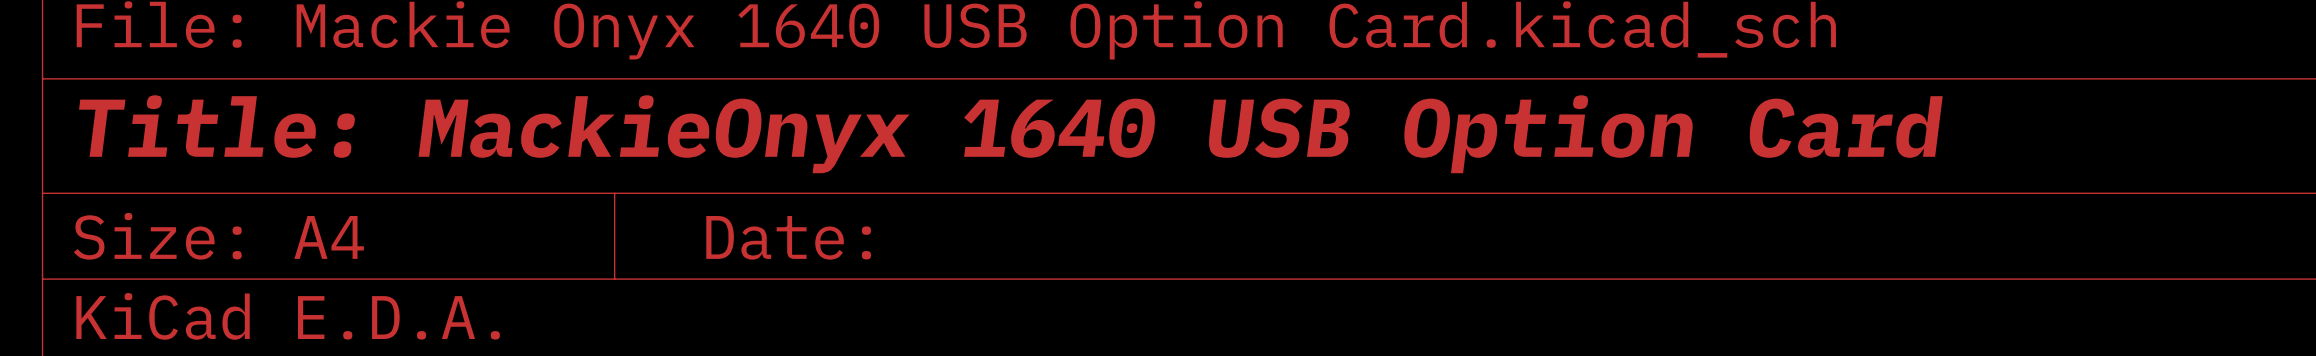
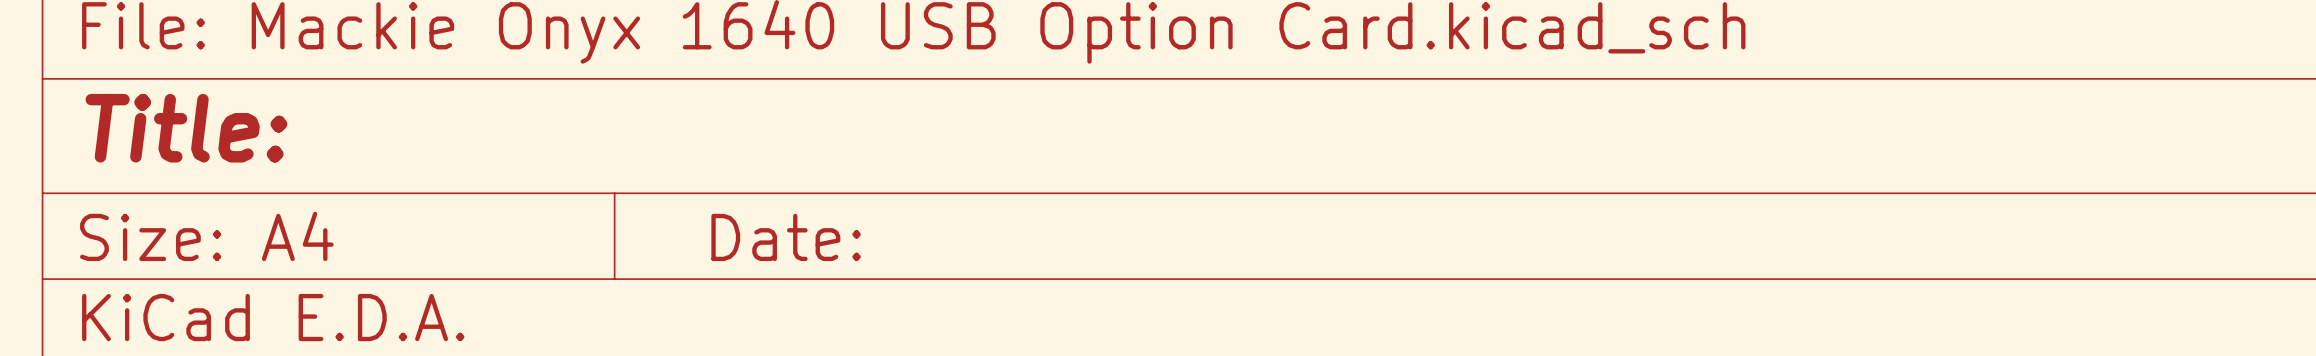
title block: Title: MackieOnyx 1640 USB Option Card (1010, 134) -> Title: (186, 128)

